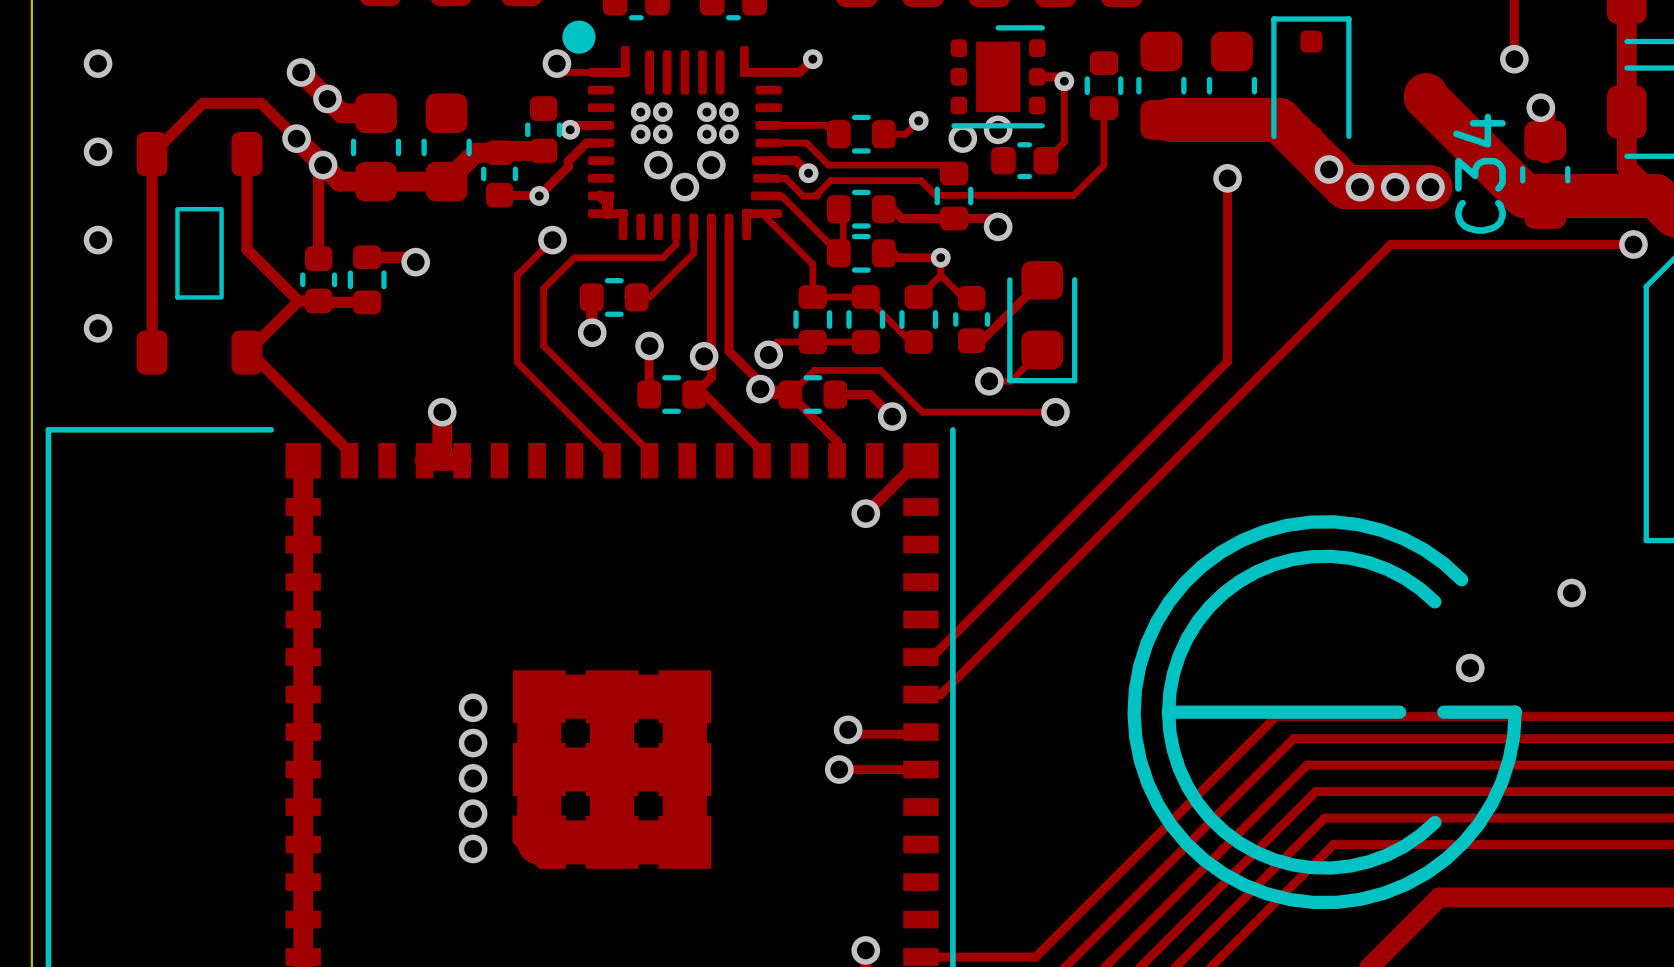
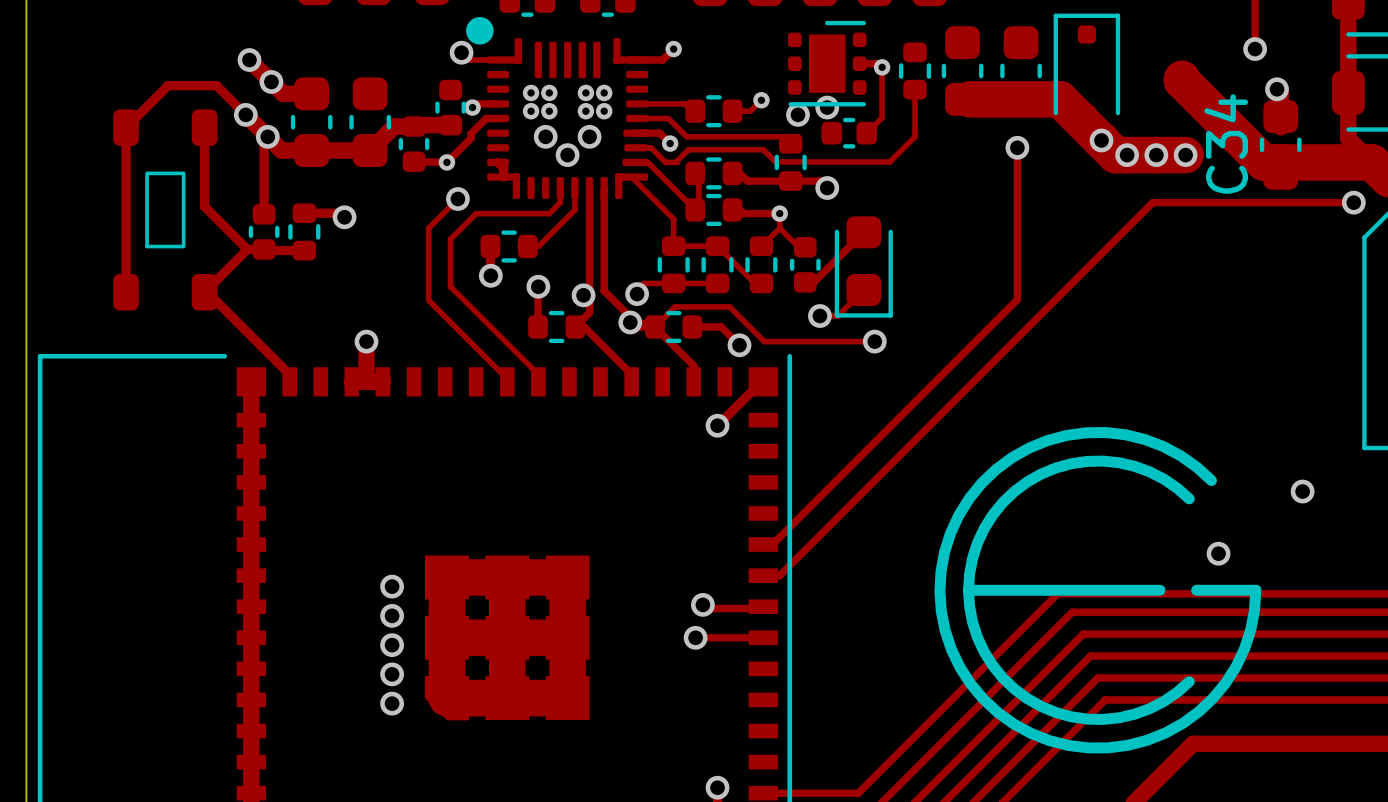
via: (98, 63) -> none
via: (98, 151) -> none
via: (98, 240) -> none
via: (98, 328) -> none

